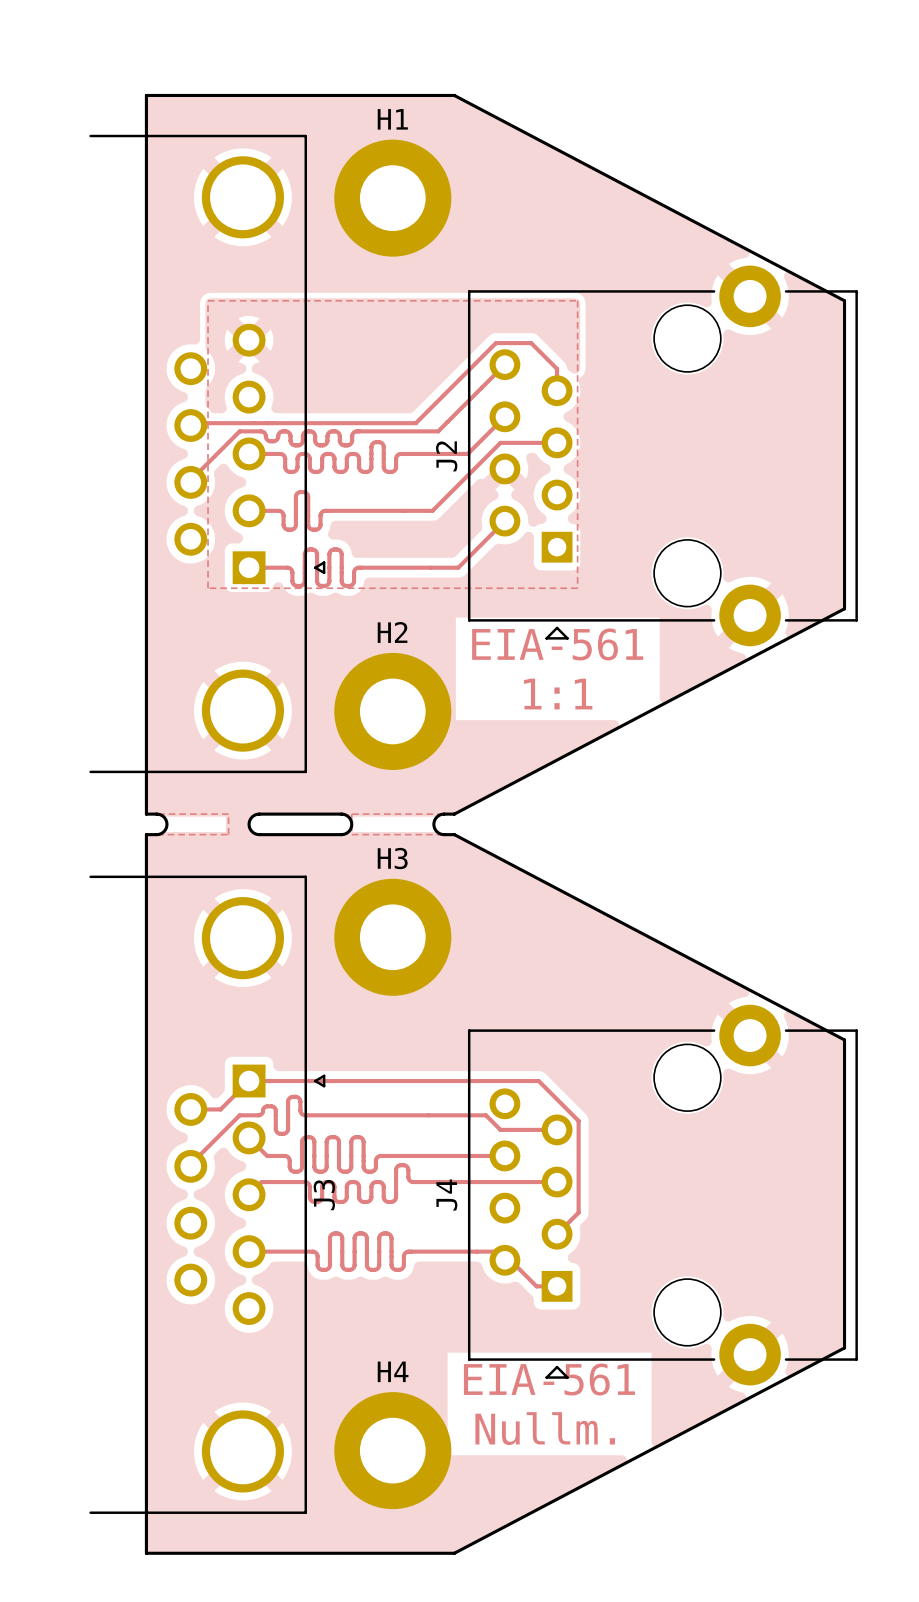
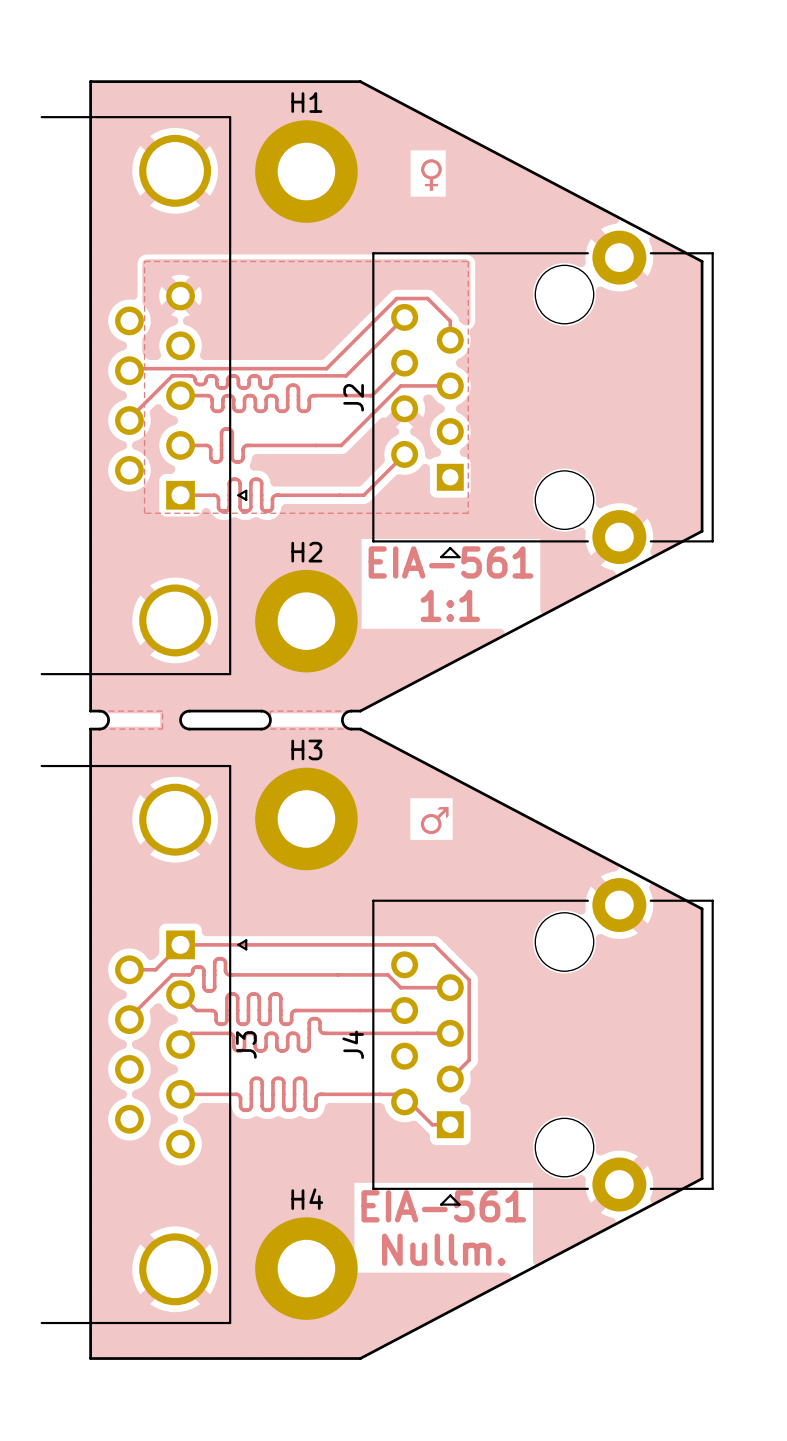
text: none -> ♀ (431, 175)
text: none -> ♂ (434, 820)

